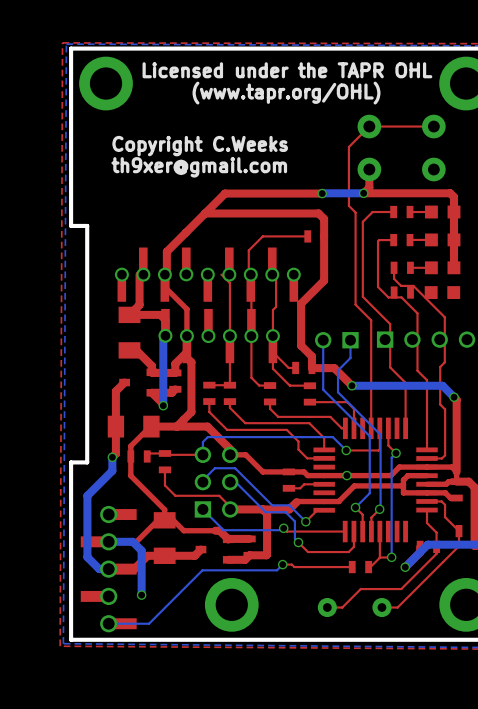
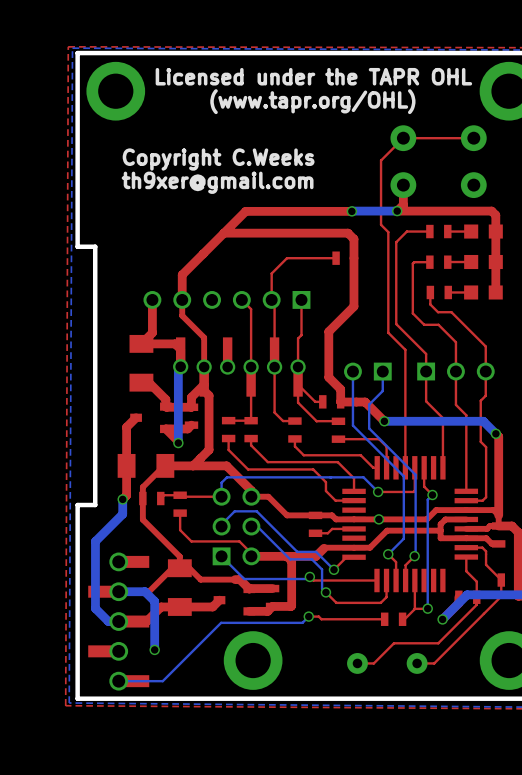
part footprint: [114, 247, 301, 302] -> [143, 290, 311, 309]
part: (402, 292) -> none
part: (442, 292) -> none
part footprint: [376, 331, 476, 348] -> [417, 362, 495, 381]

